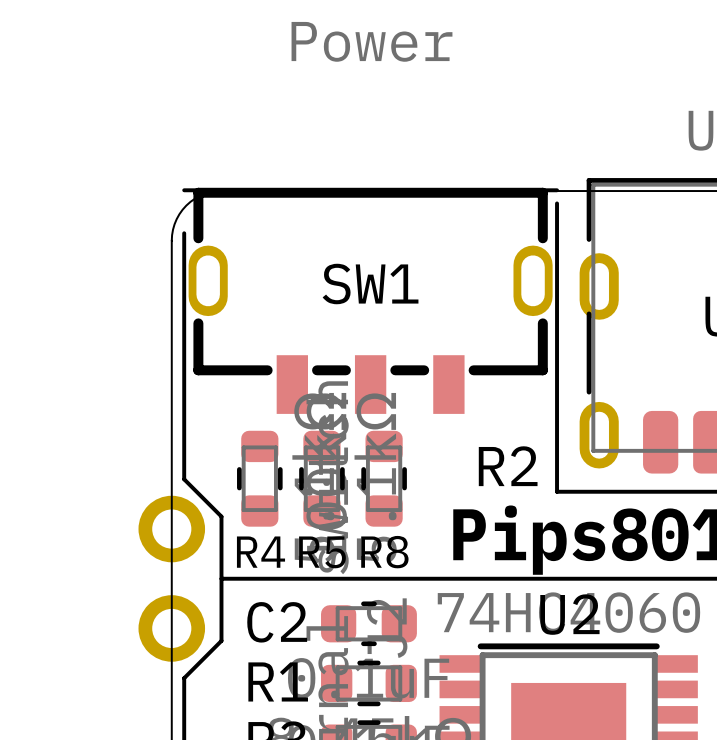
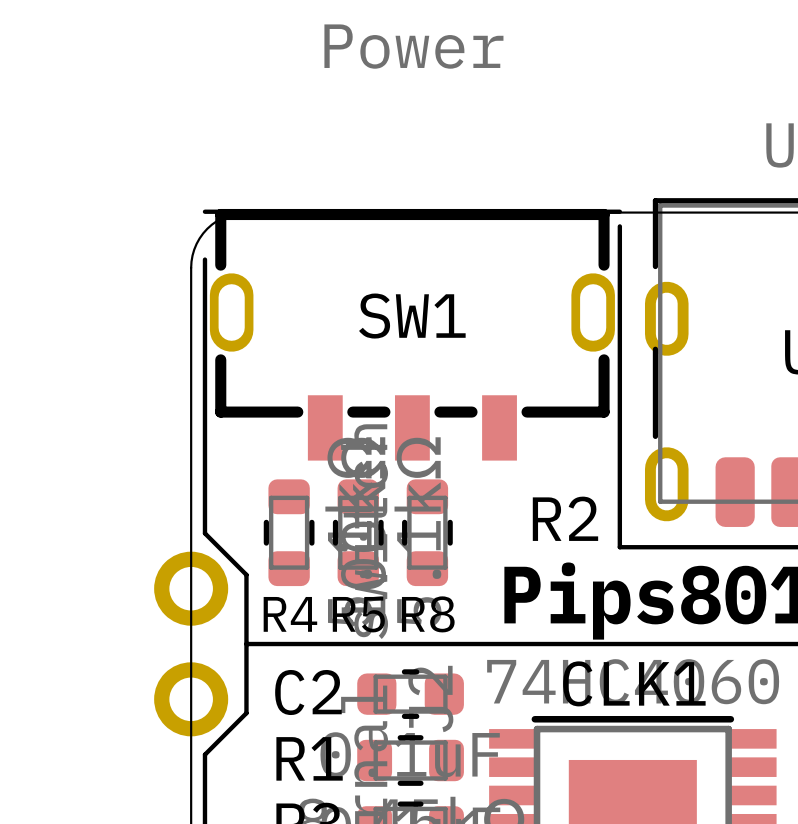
U2 name: U2 (569, 614) -> CLK1 (634, 683)

